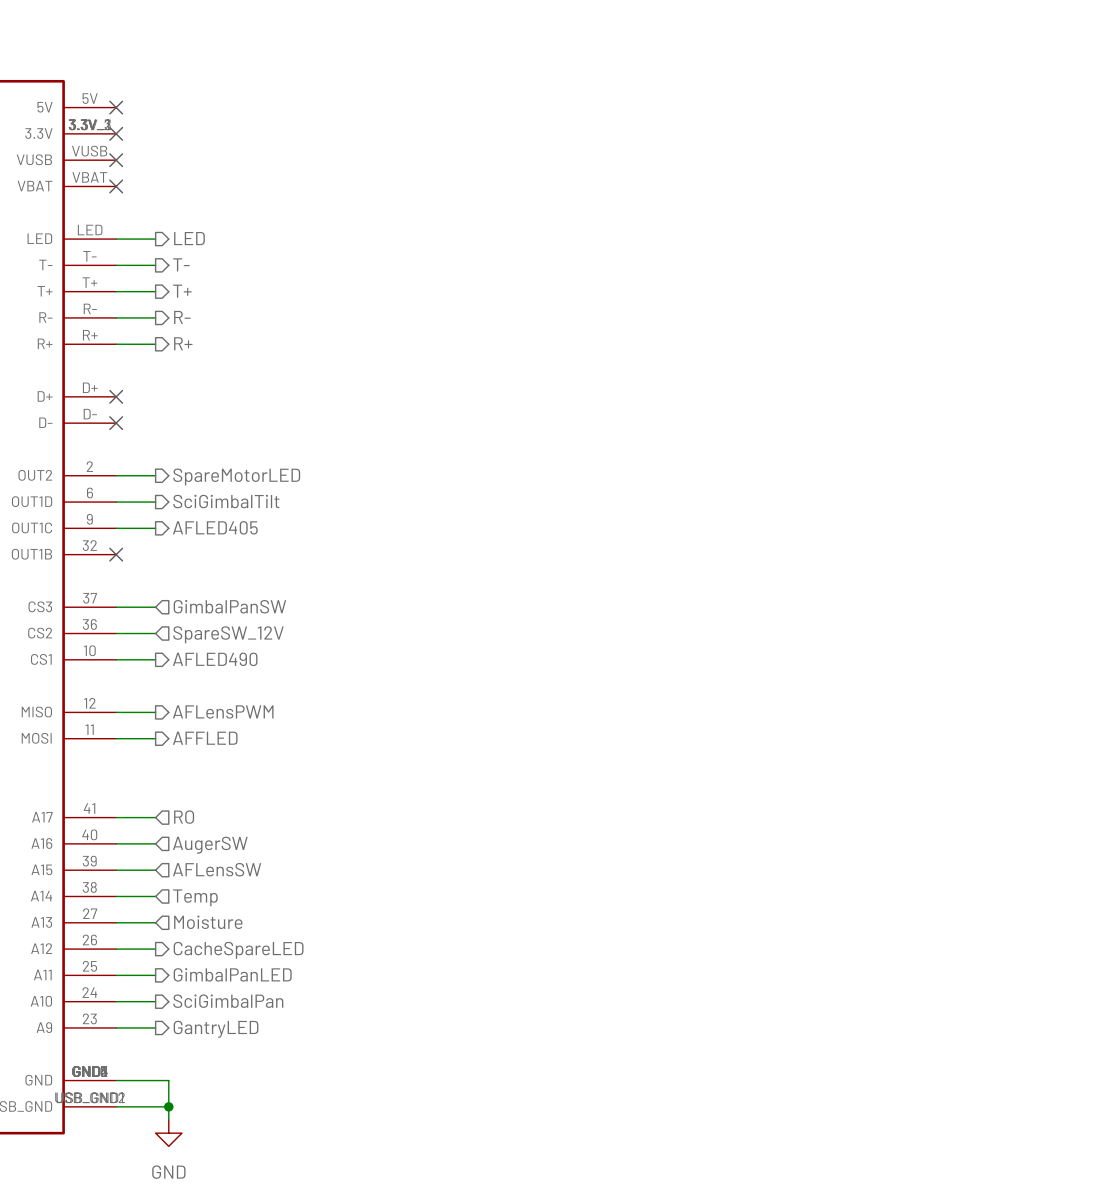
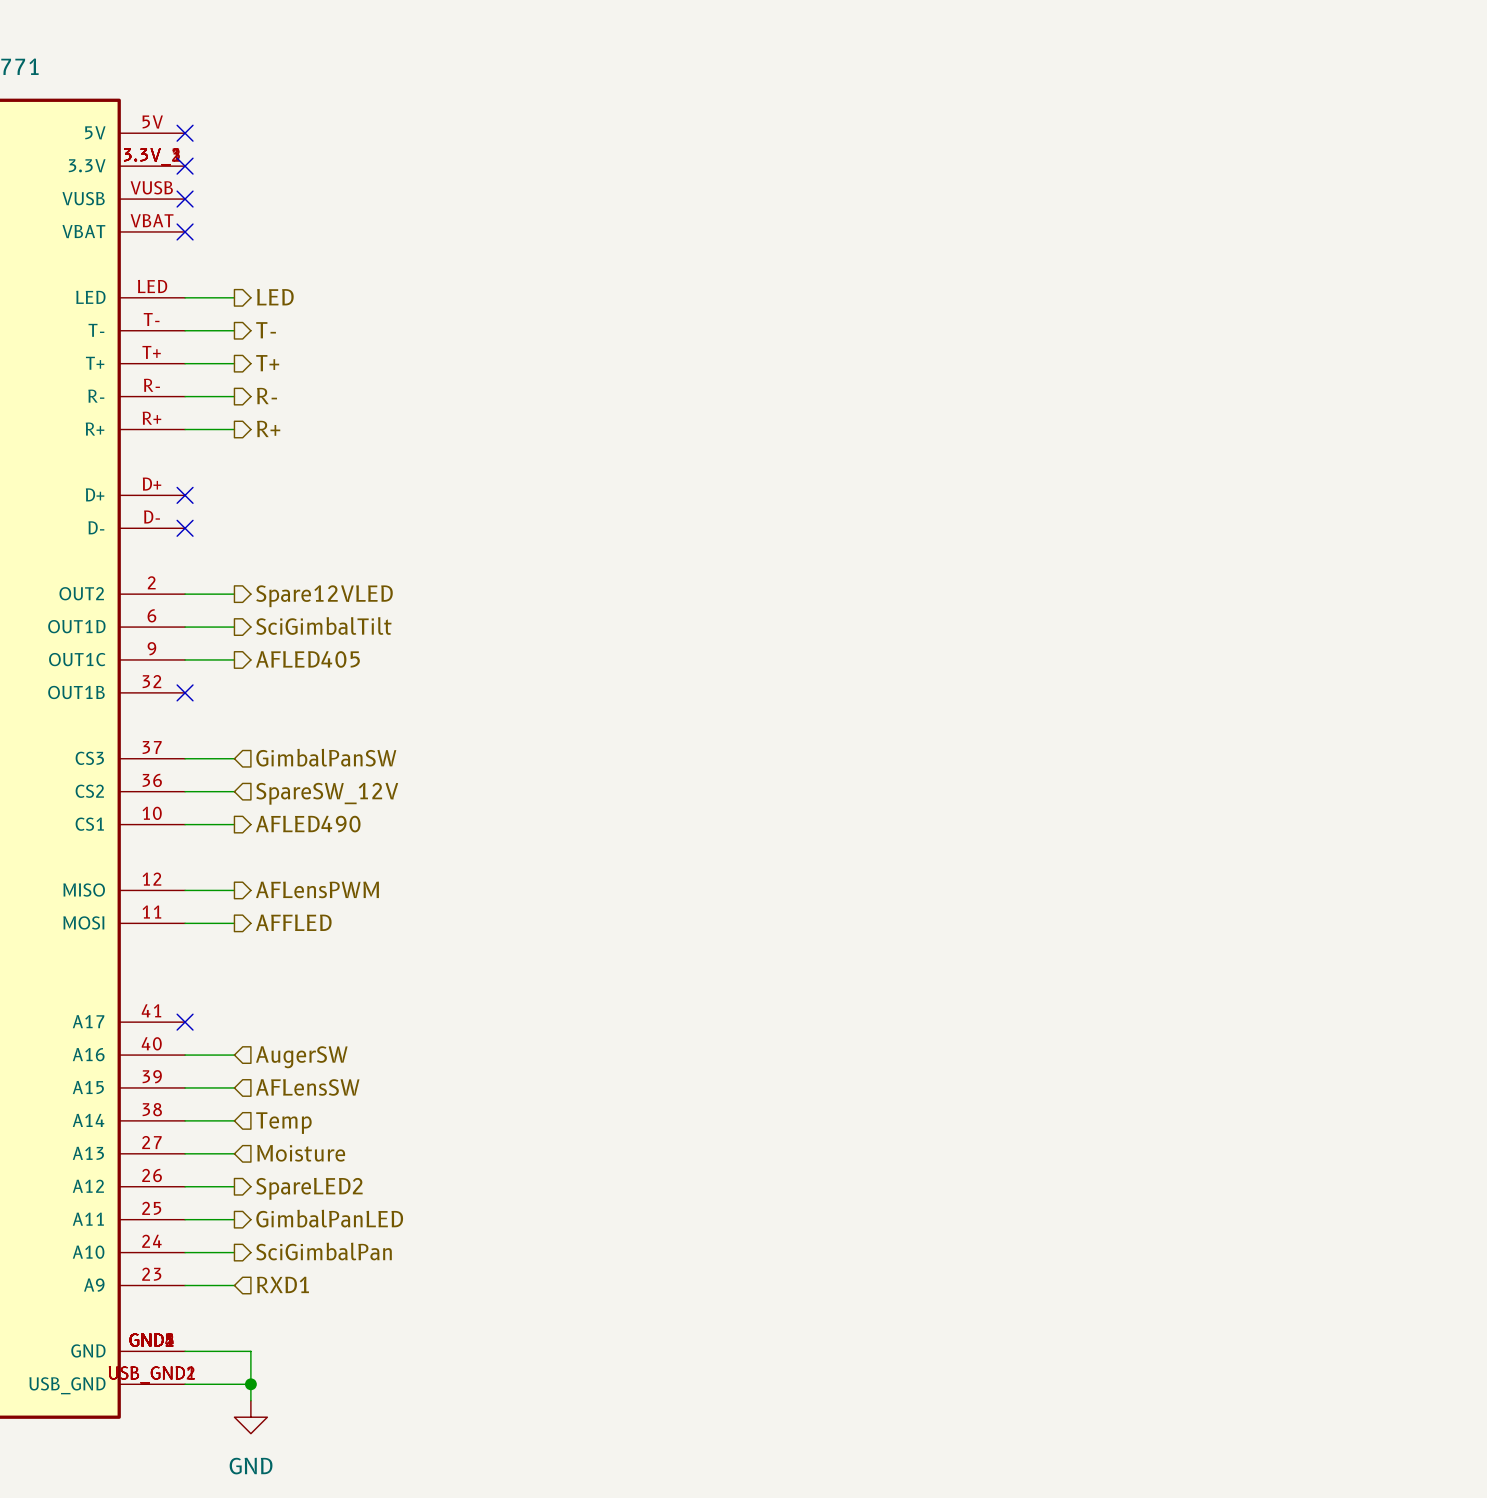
hierarchical label: SpareMotorLED (236, 476) -> Spare12VLED (324, 596)
wire: (116, 817) (155, 817) -> none
no-connect mark: none -> (185, 1022)
hierarchical label: RO (184, 817) -> none
hierarchical label: CacheSpareLED (238, 950) -> SpareLED2 (309, 1188)
hierarchical label shape: output (216, 1029) -> input (282, 1284)
hierarchical label: GantryLED (216, 1029) -> RXD1 (282, 1284)

